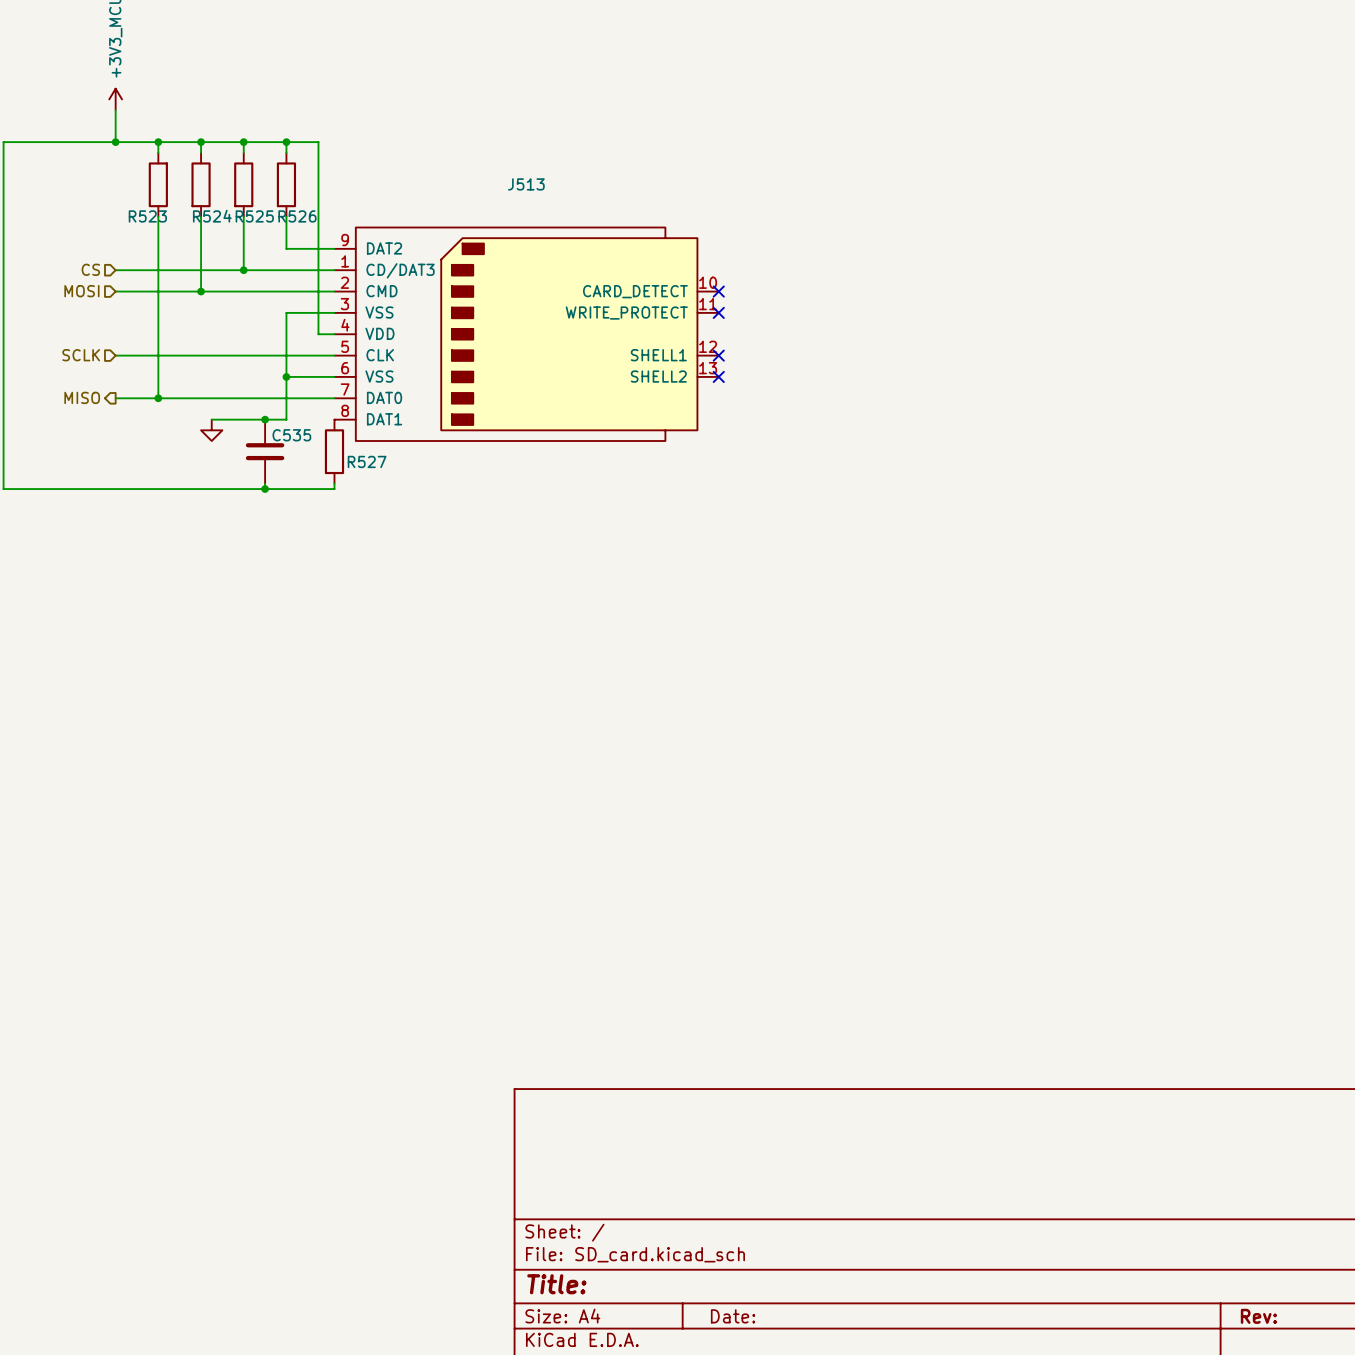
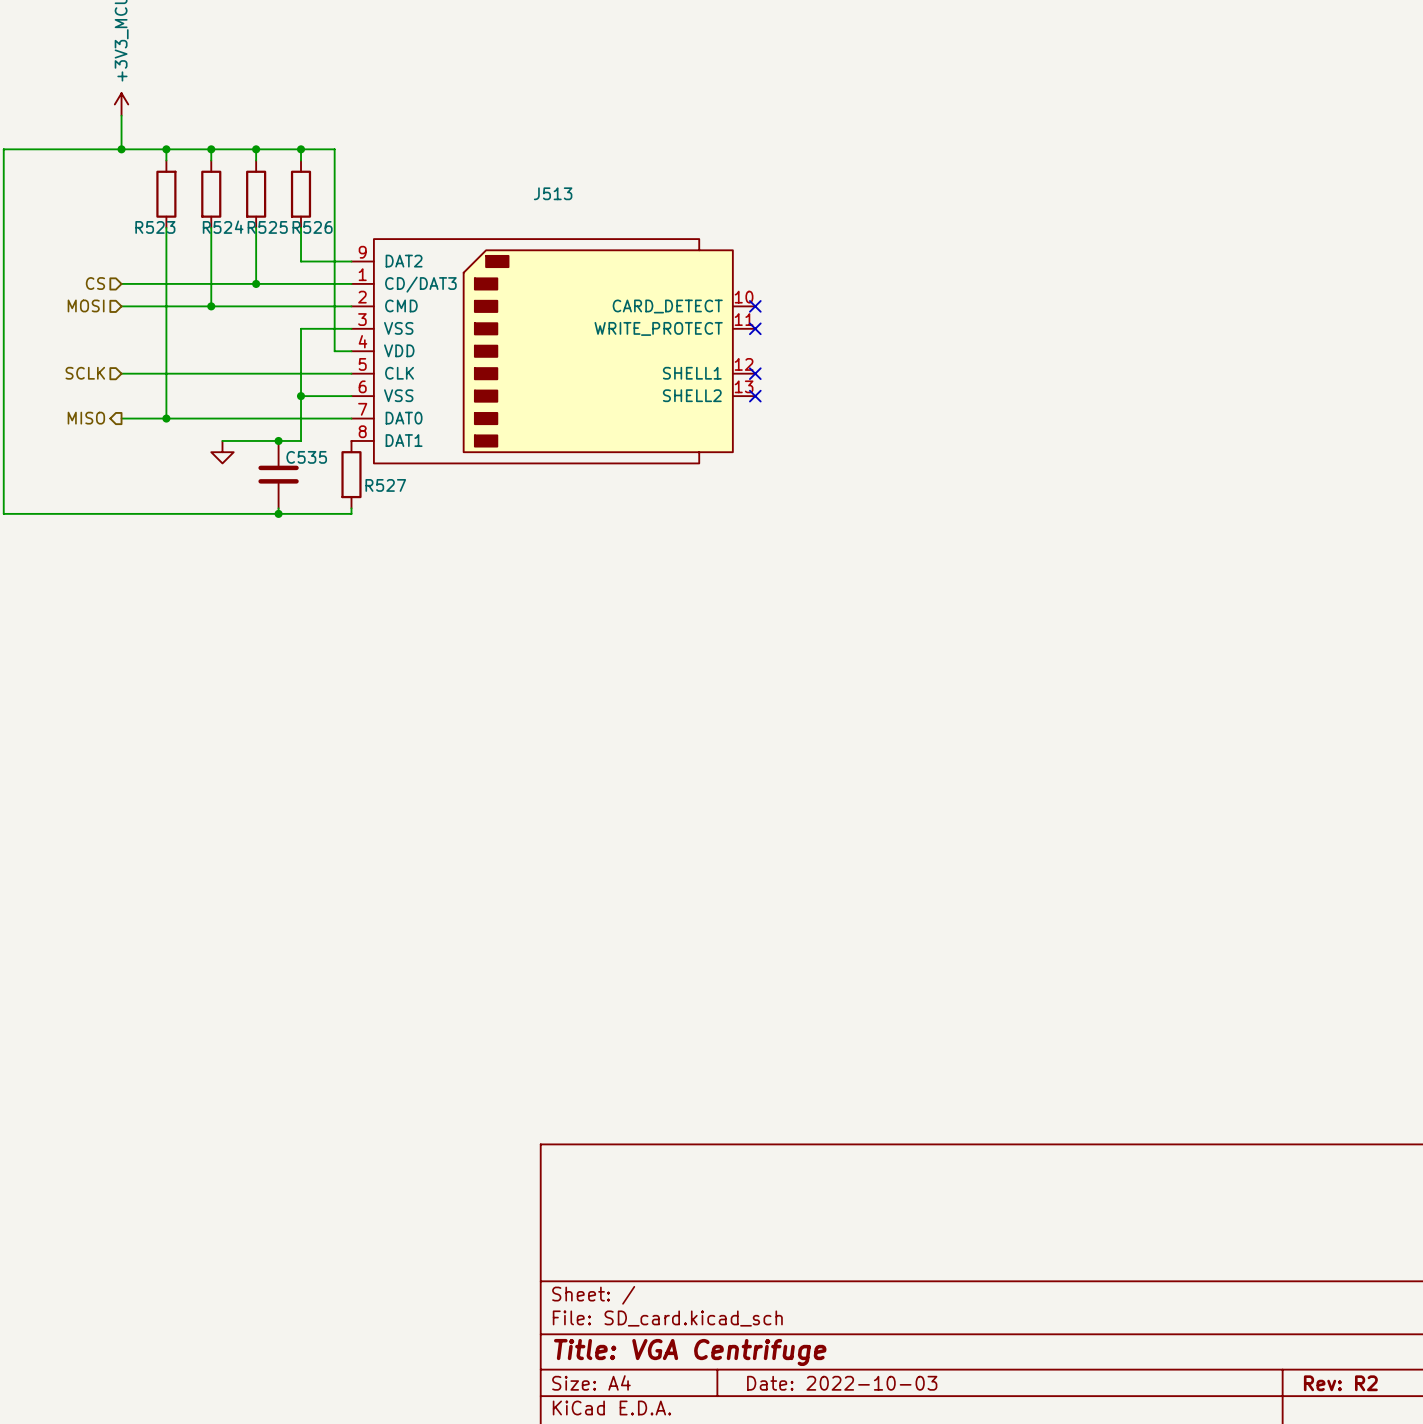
title block: Title: (556, 1284) -> Title: VGA Centrifuge (690, 1352)
title block: Date: (733, 1316) -> Date: 2022-10-03 (842, 1383)
title block: Rev: (1258, 1316) -> Rev: R2 (1340, 1383)

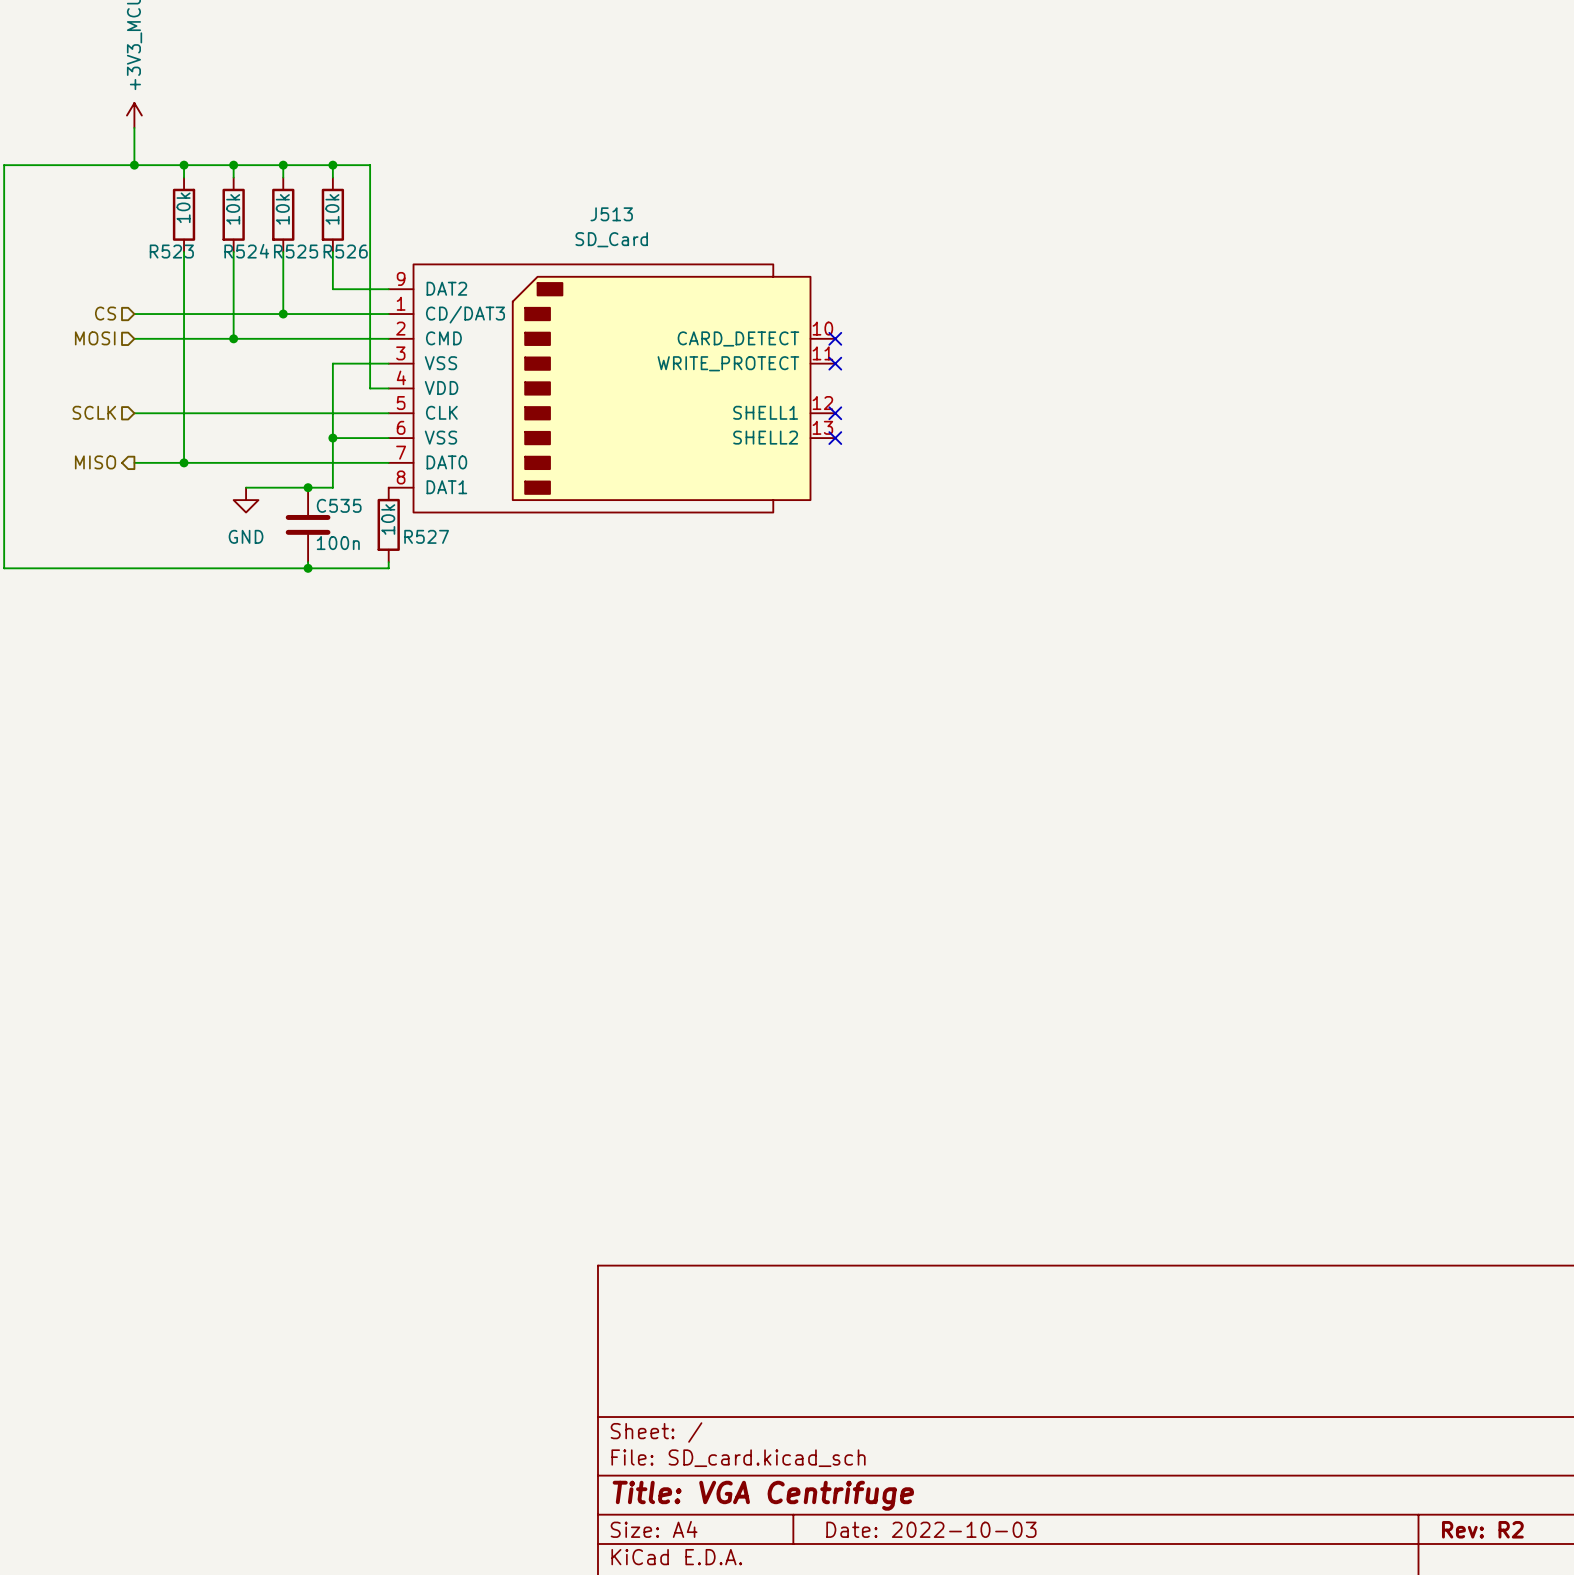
R523 value: none -> 10k (183, 207)
R524 value: none -> 10k (233, 209)
R525 value: none -> 10k (282, 209)
R526 value: none -> 10k (332, 209)
J513 value: none -> SD_Card (611, 239)
R527 value: none -> 10k (388, 519)
power symbol text: none -> GND (246, 536)
C535 value: none -> 100n (338, 543)

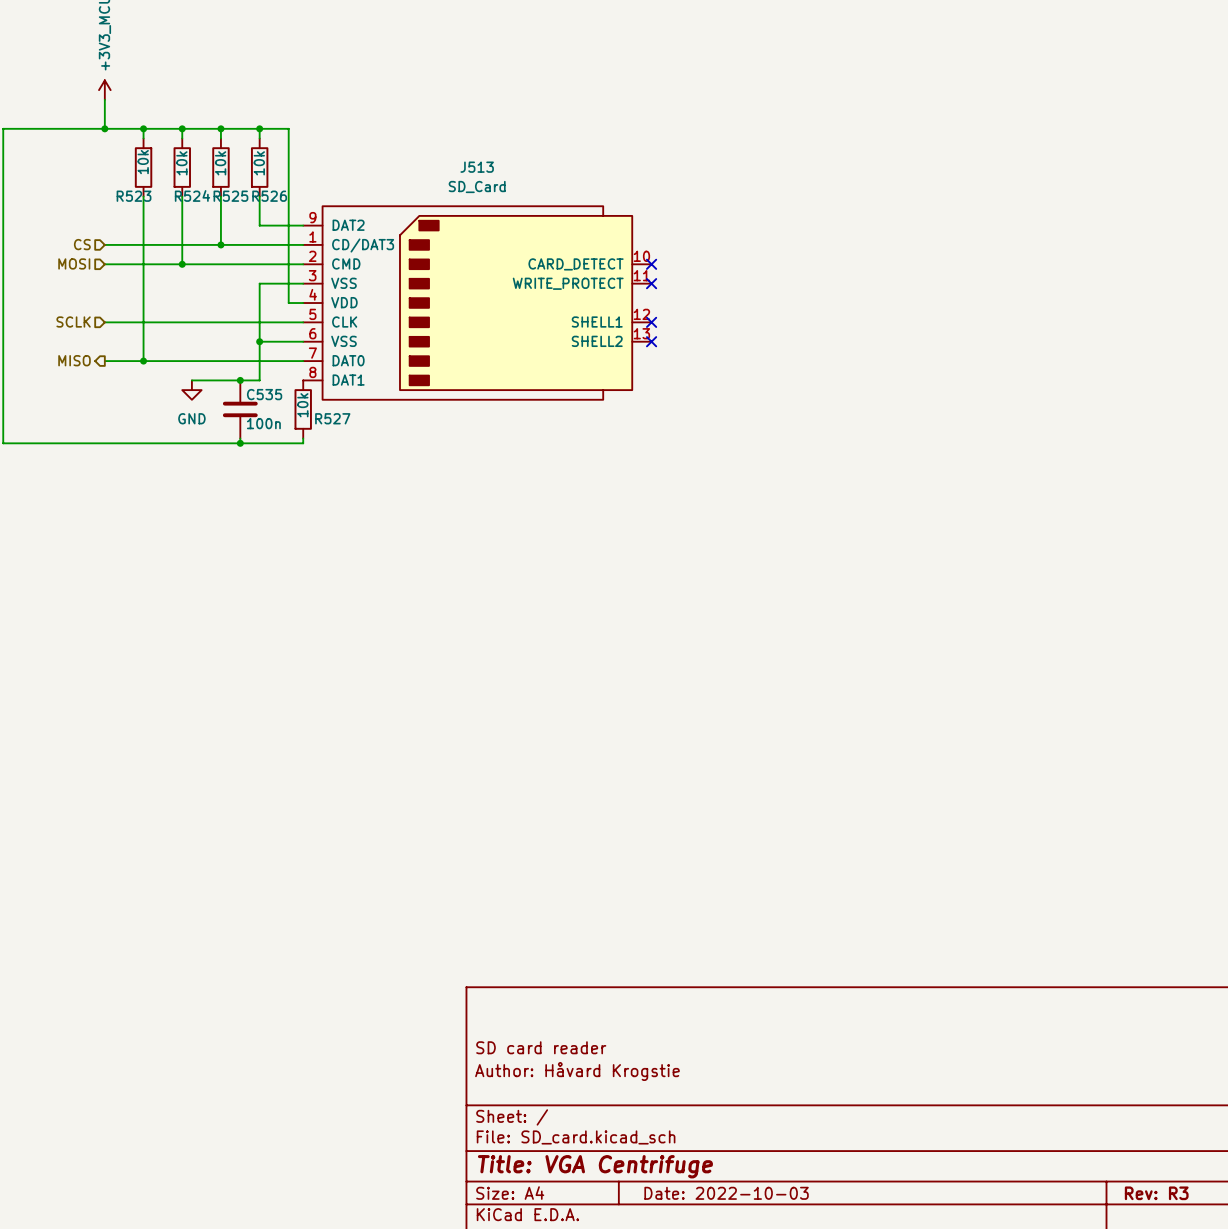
title block: none -> SD card reader (541, 1047)
title block: none -> Author: Håvard Krogstie (577, 1071)
title block: Rev: R2 (1482, 1529) -> Rev: R3 (1156, 1193)

